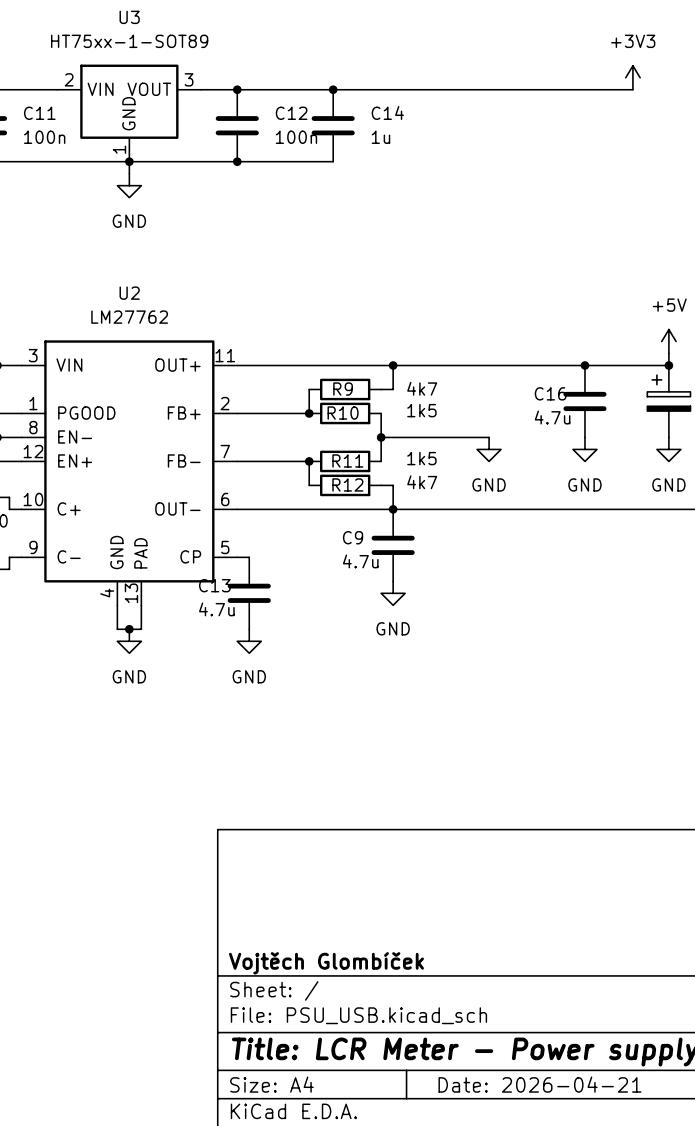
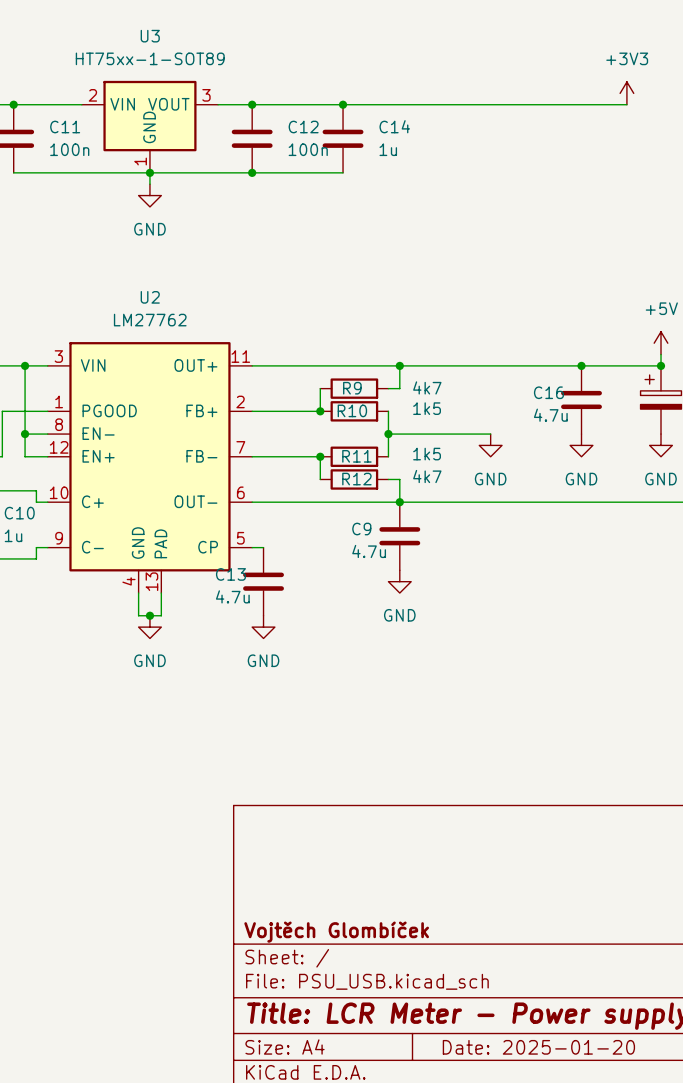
title block: Date: 2026-04-21 (540, 1084) -> Date: 2025-01-20 (538, 1047)

